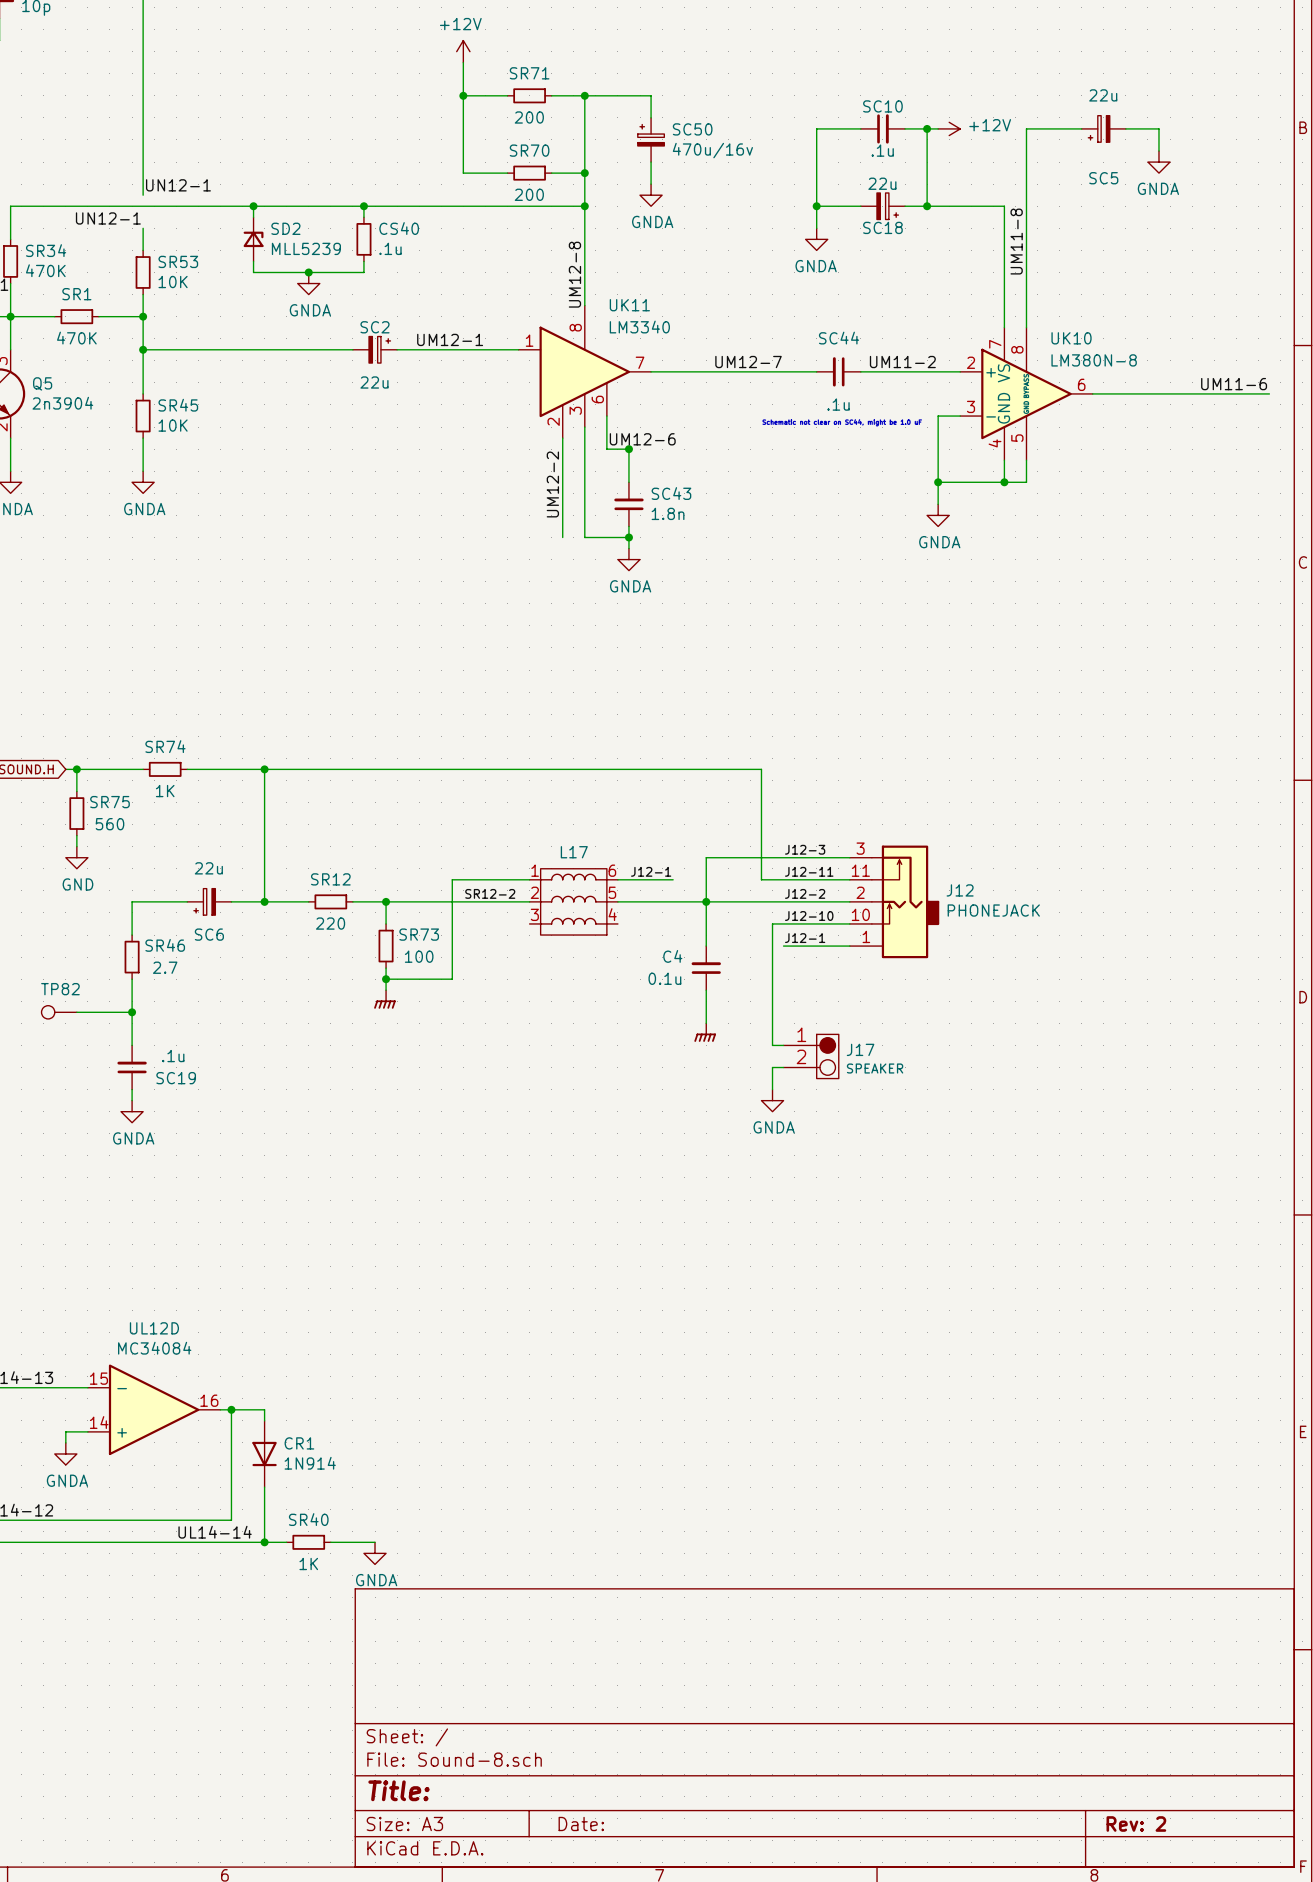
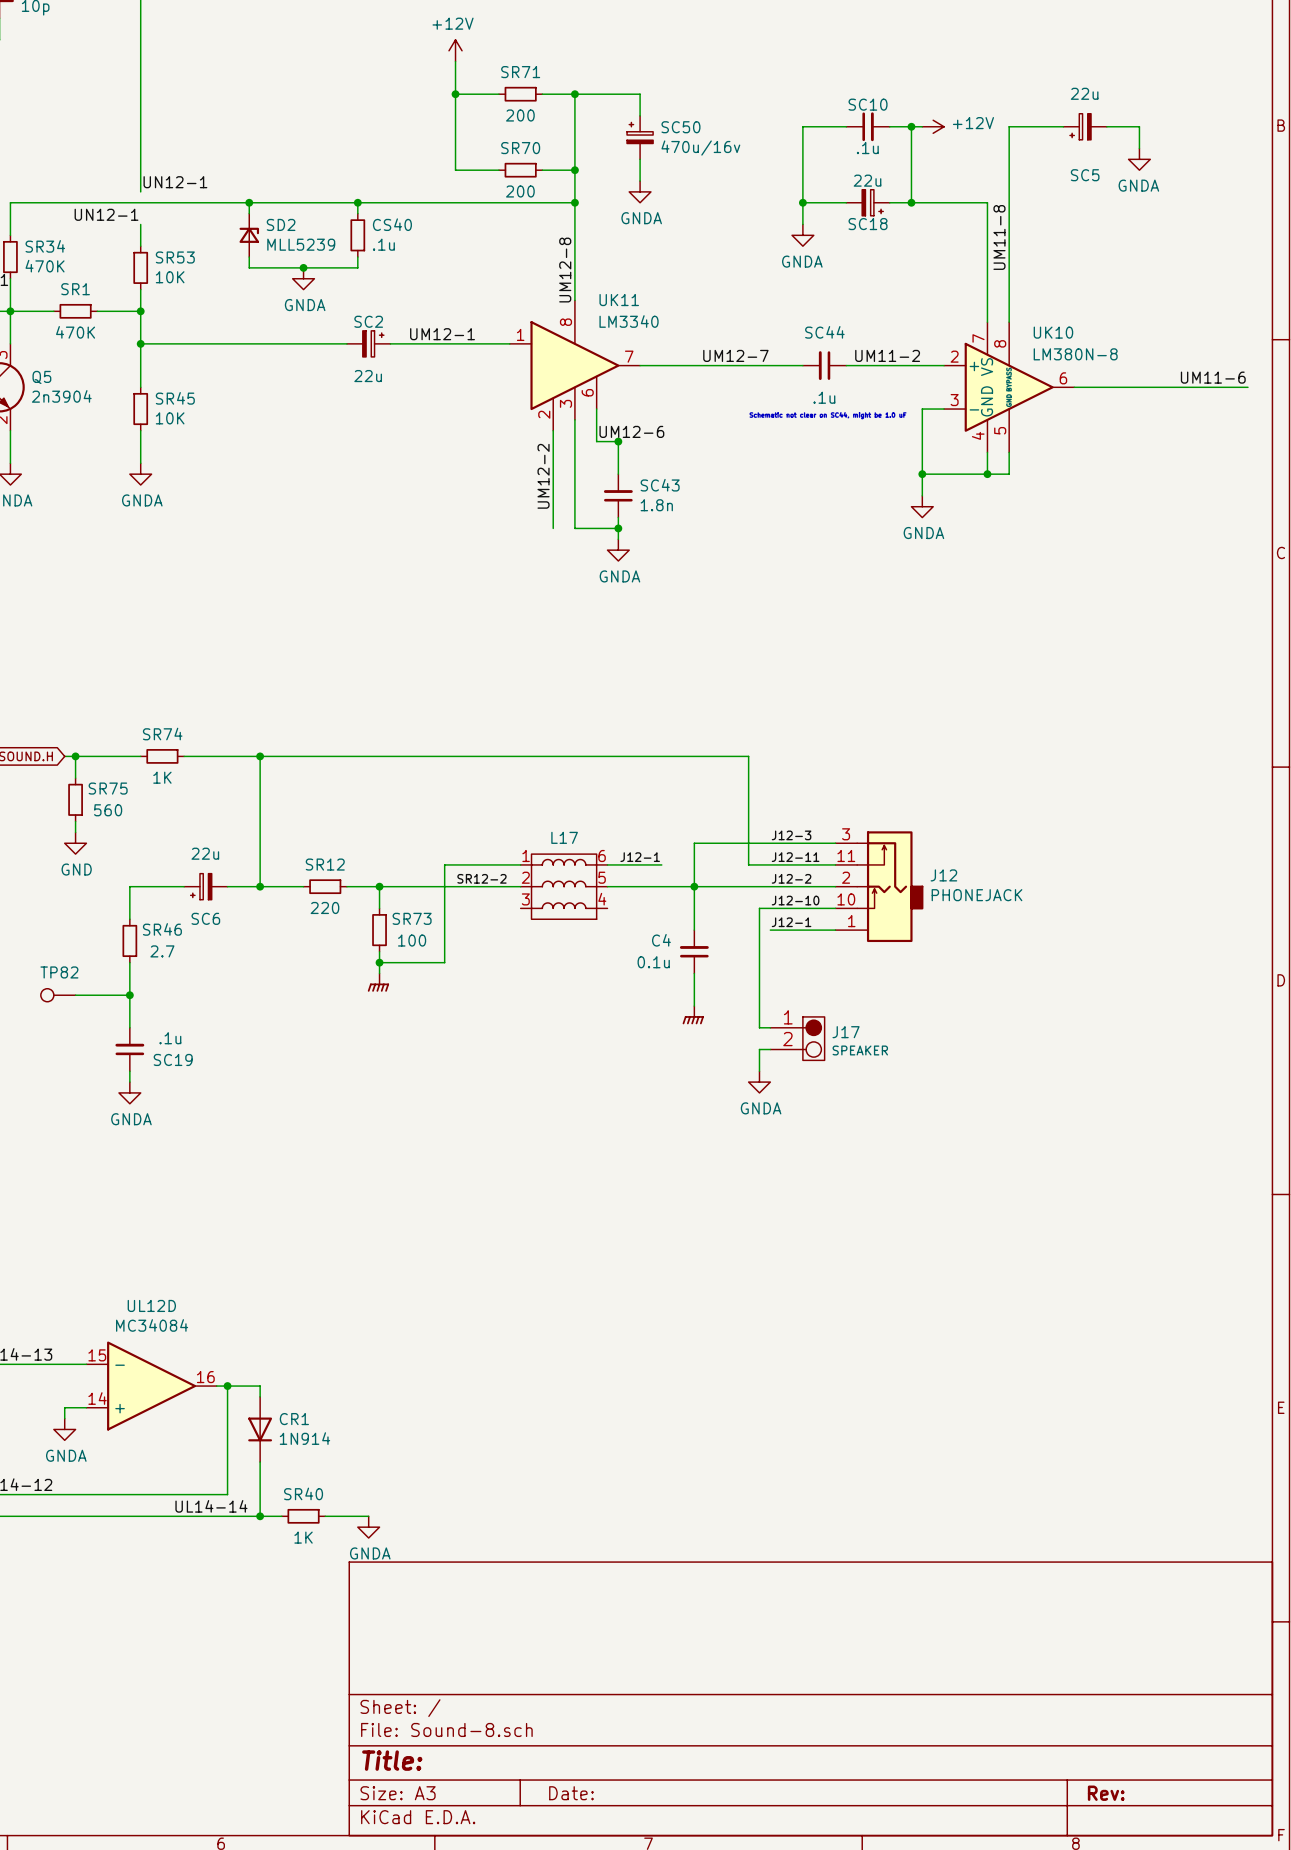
title block: Rev: 2 (1136, 1823) -> Rev: (1106, 1793)

